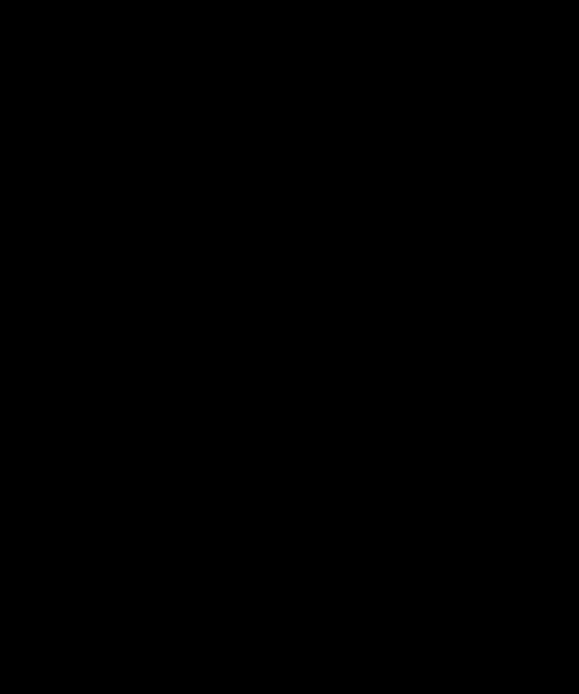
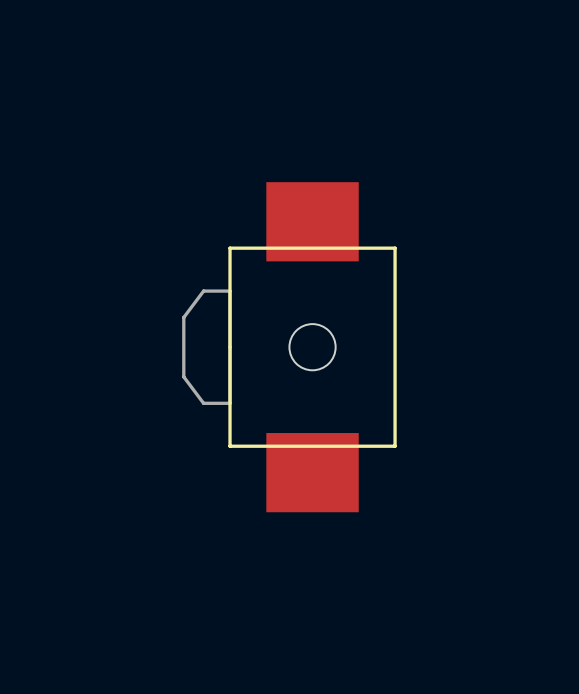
part: none -> (289, 347)

